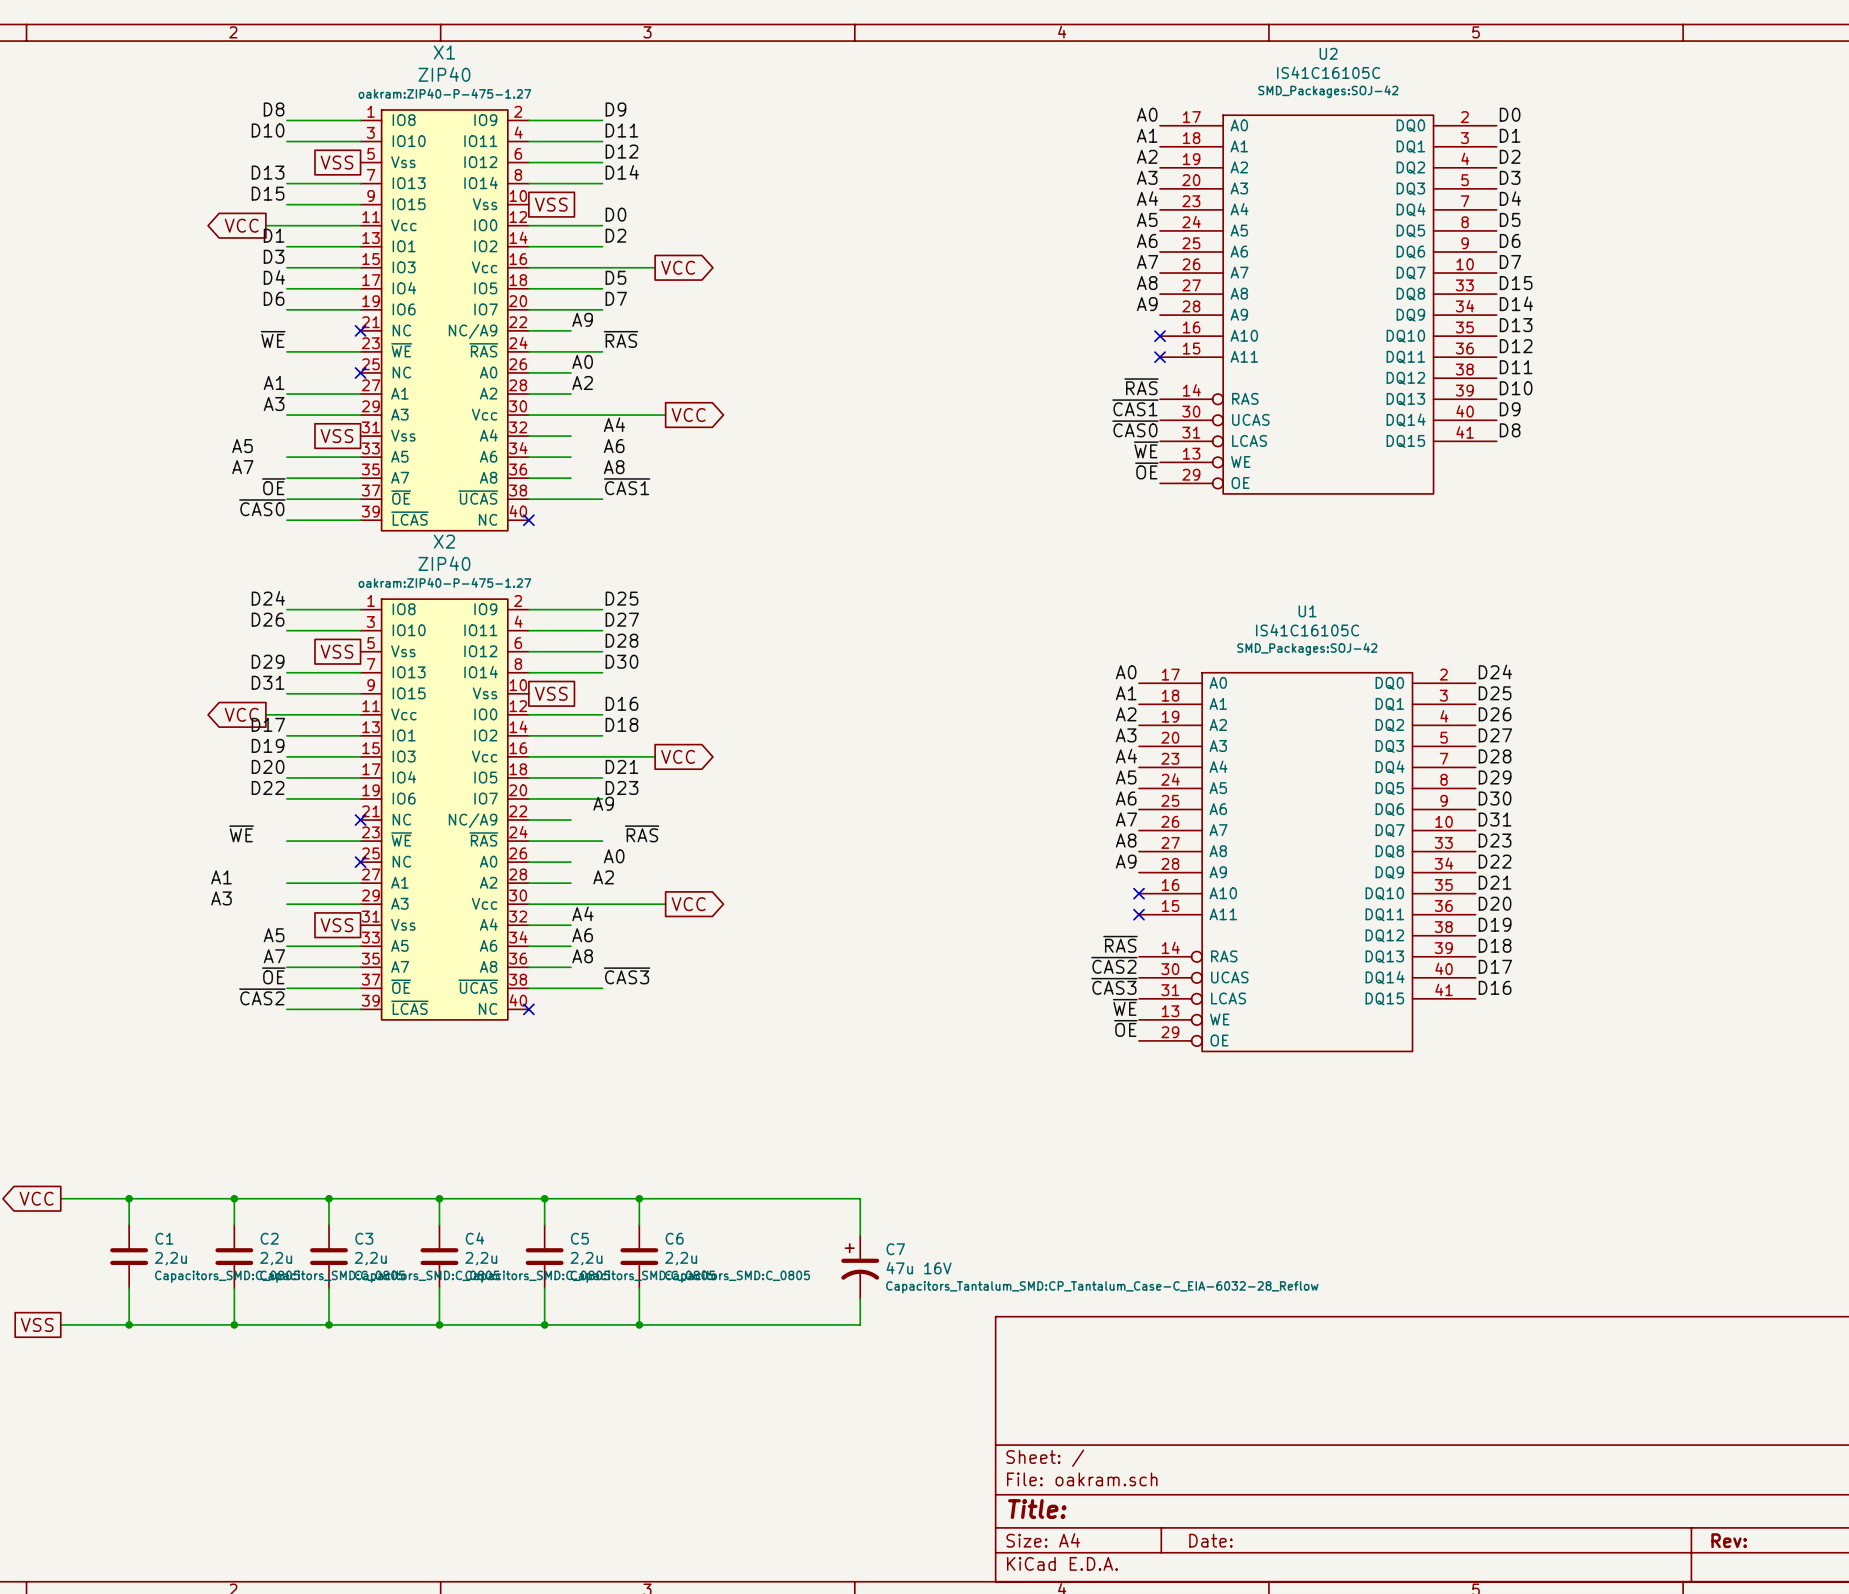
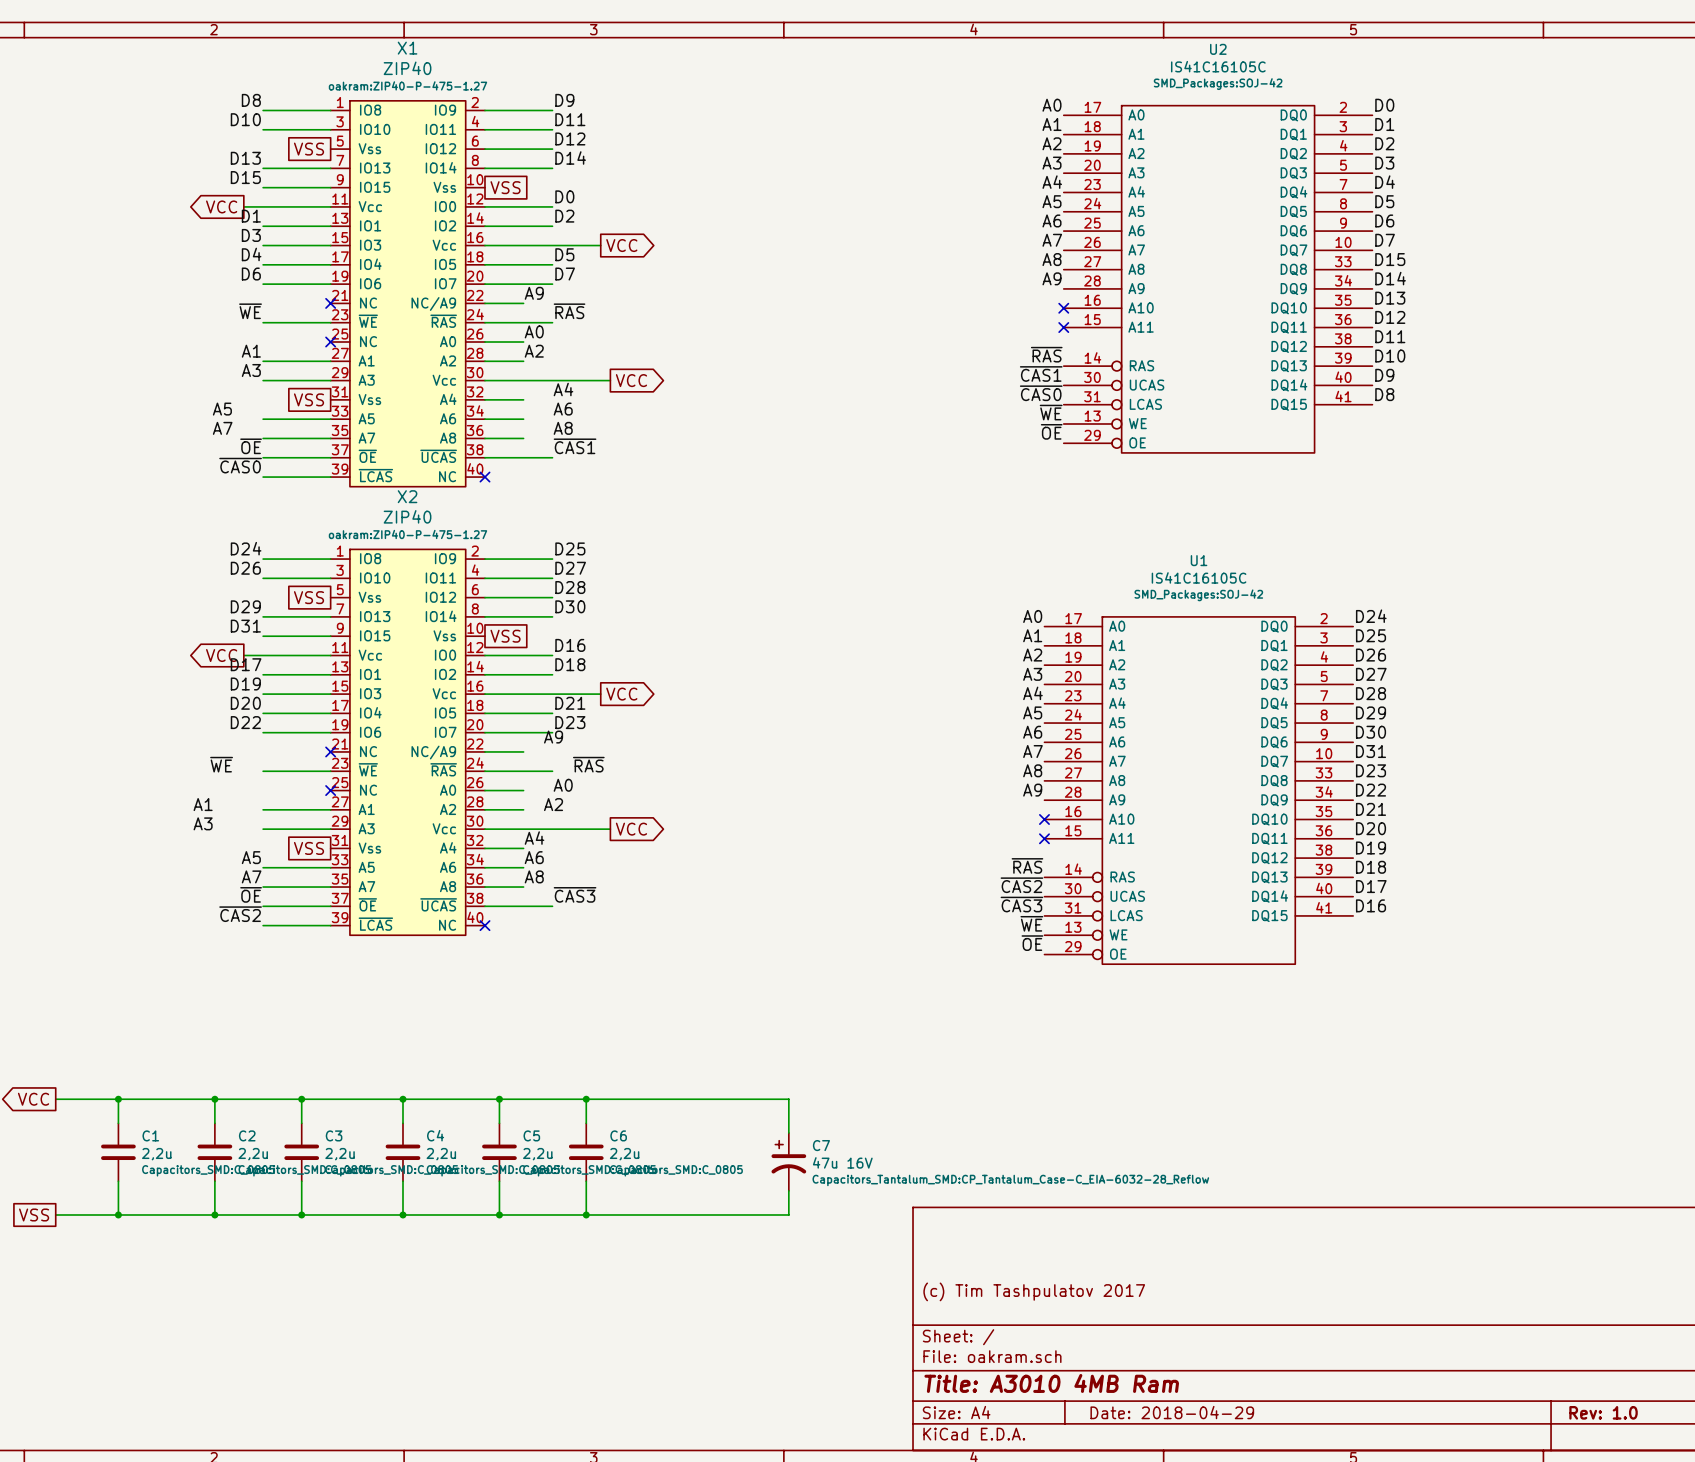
title block: none -> (c) Tim Tashpulatov 2017 (1034, 1291)
title block: Title: (1037, 1509) -> Title: A3010 4MB Ram (1051, 1383)
title block: Date: (1210, 1540) -> Date: 2018-04-29 (1172, 1412)
title block: Rev: (1729, 1540) -> Rev: 1.0 (1603, 1412)

